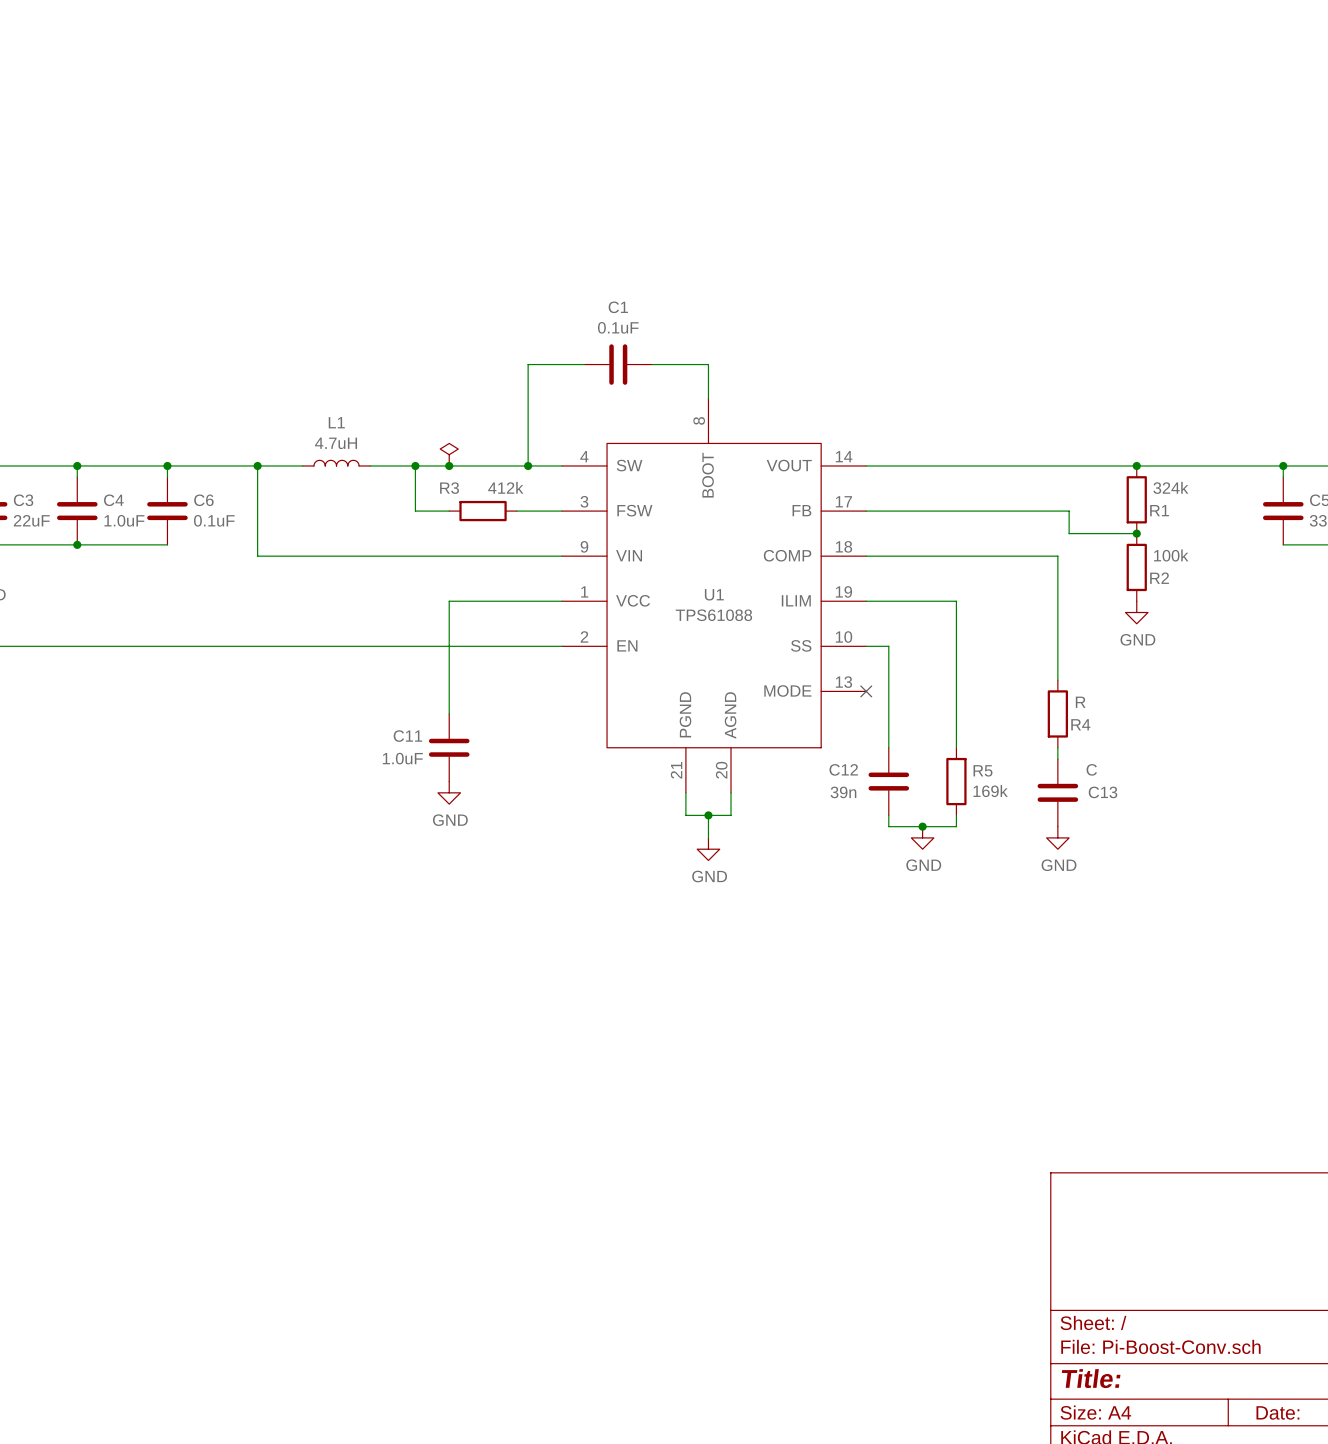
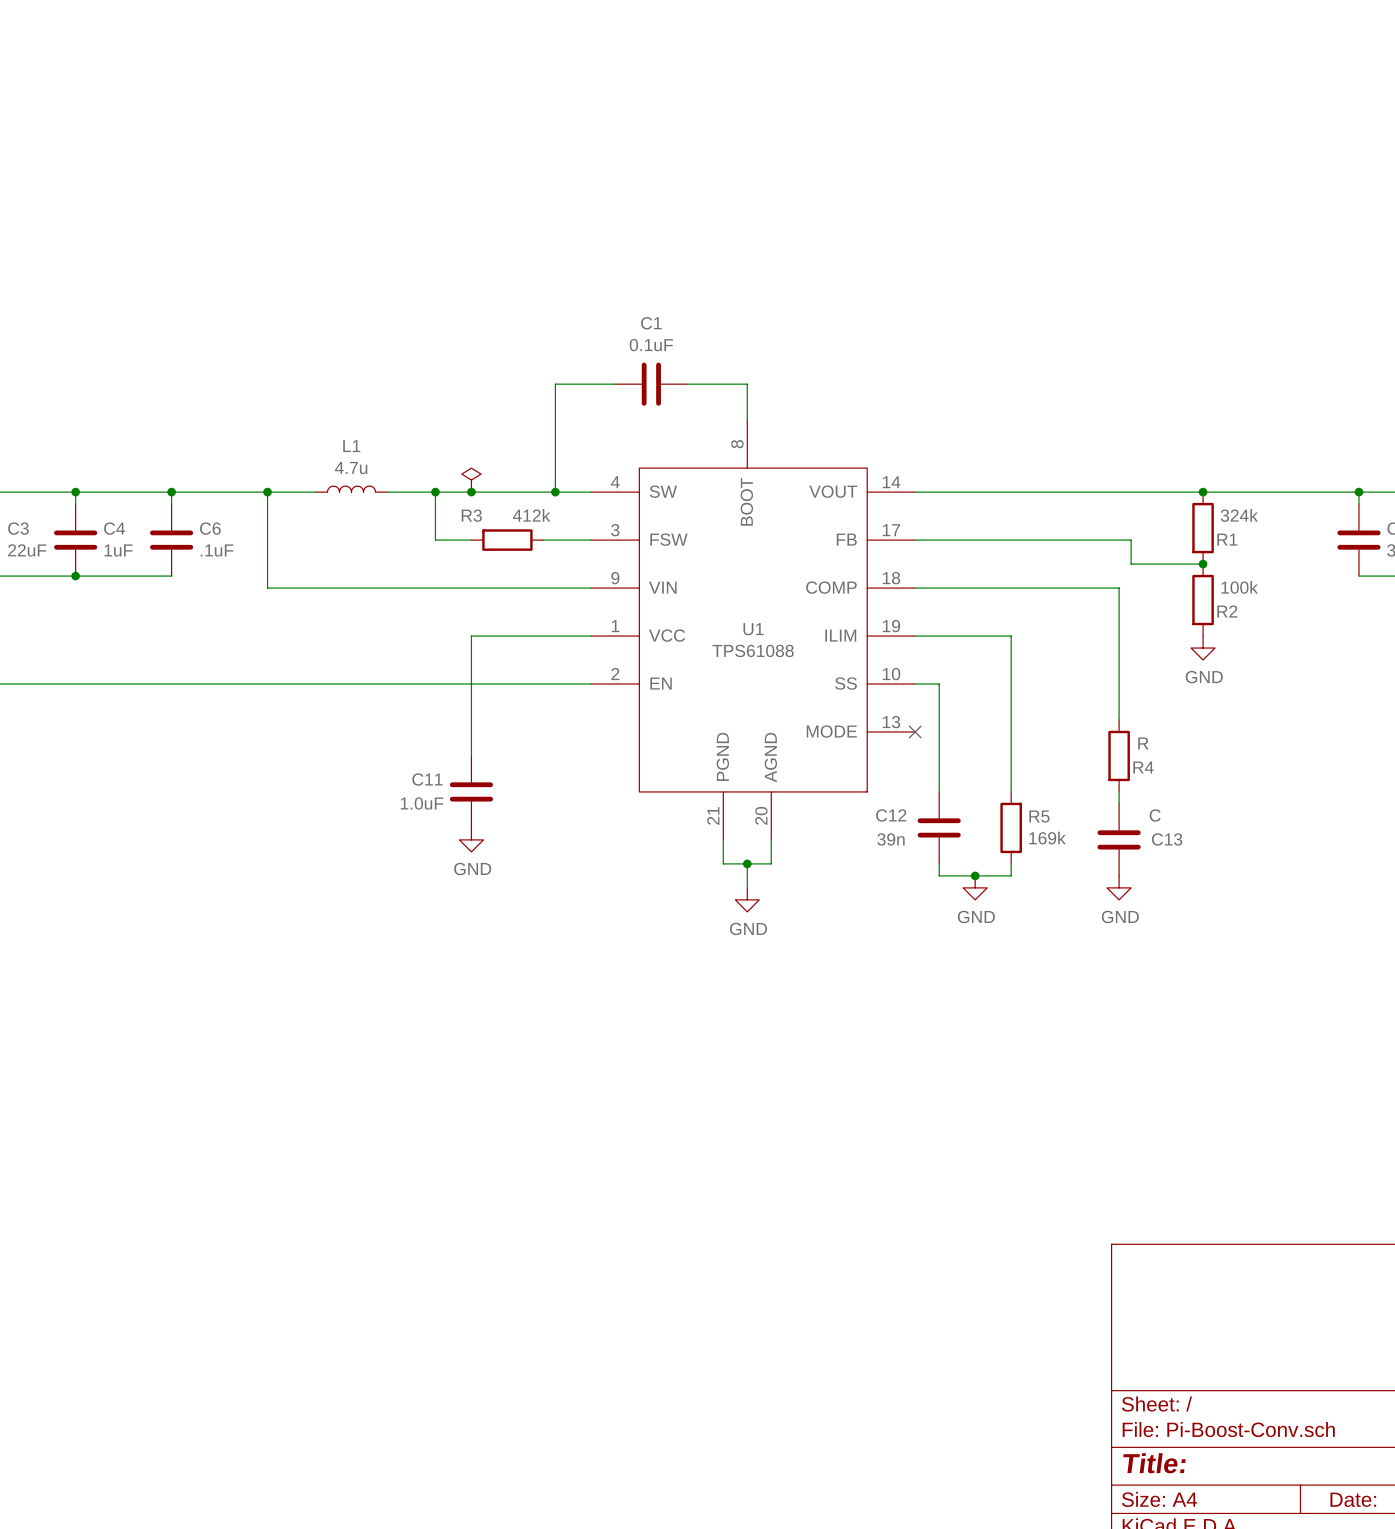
L1 value: 4.7uH (336, 443) -> 4.7u (351, 467)
C4 value: 1.0uF (124, 520) -> 1uF (118, 550)
C6 value: 0.1uF (214, 520) -> .1uF (217, 550)

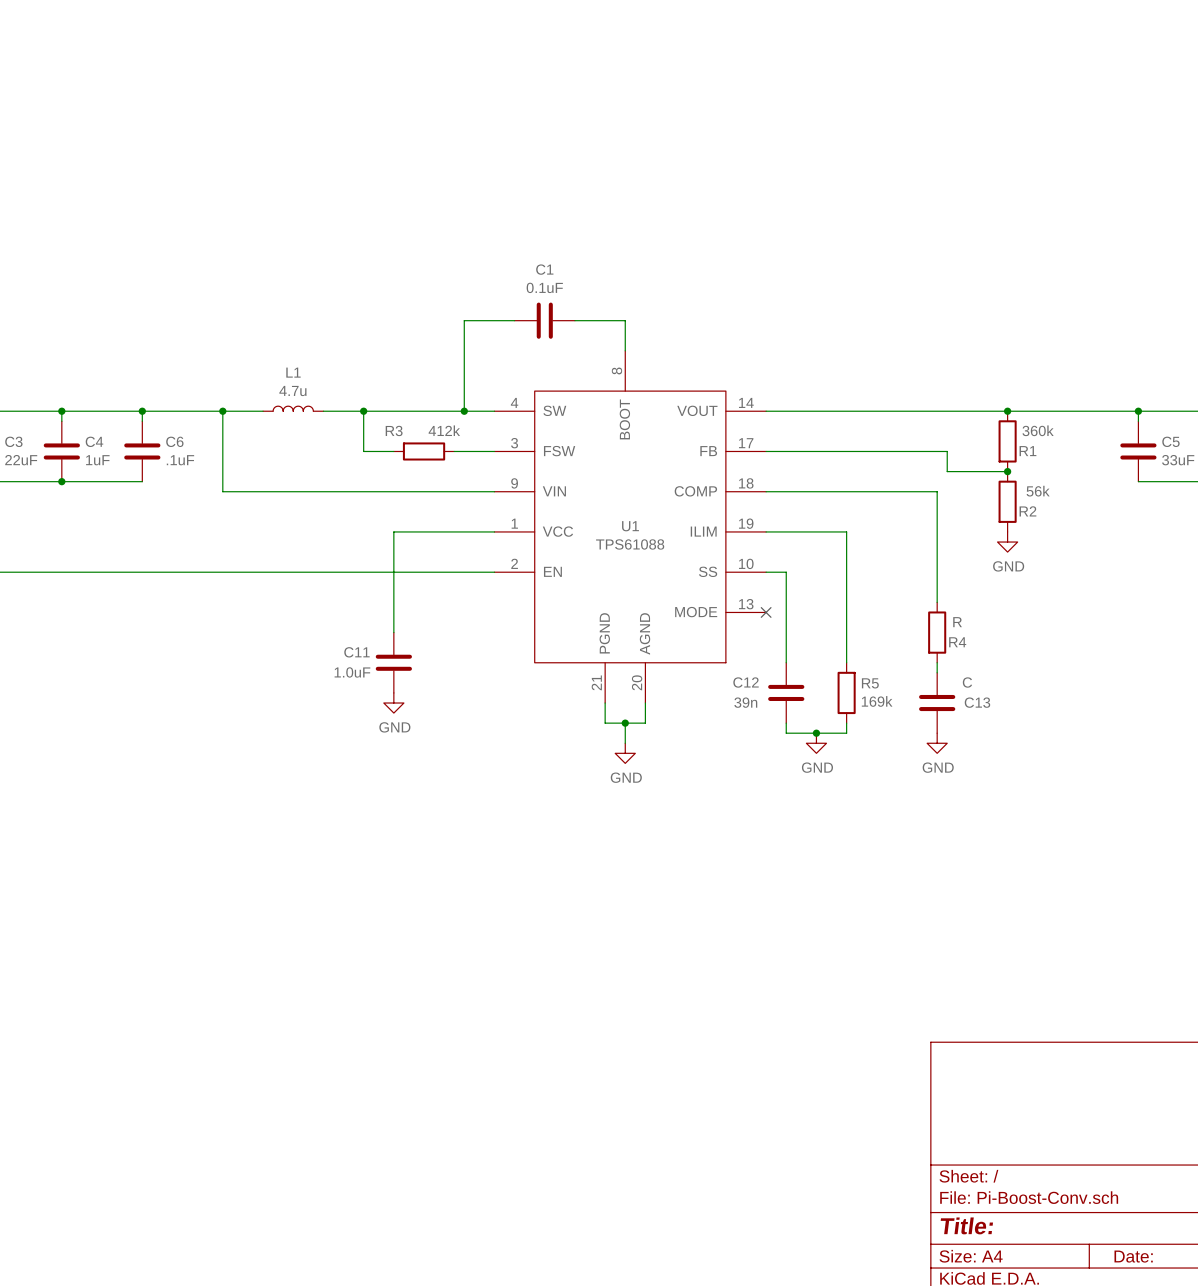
power symbol: (471, 480) -> none
junction: (471, 492) -> none
R1 value: 324k (1239, 515) -> 360k (1038, 430)
R2 value: 100k (1239, 587) -> 56k (1038, 491)

